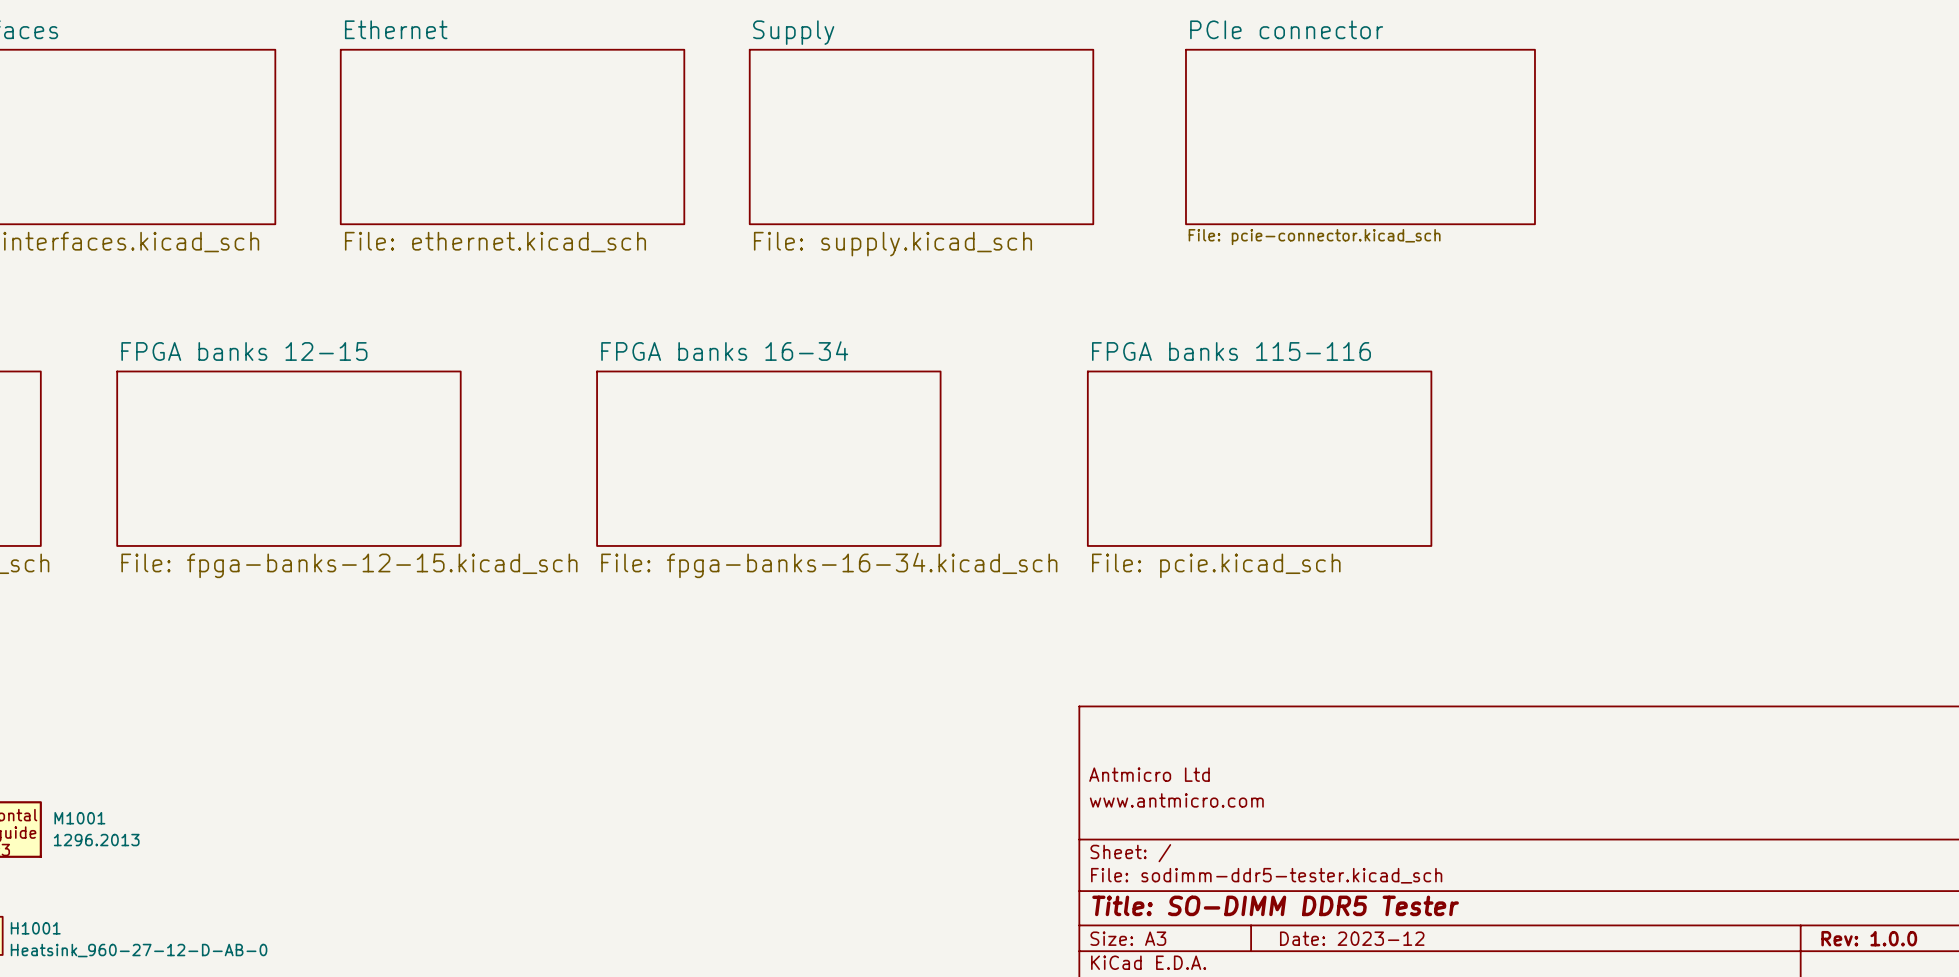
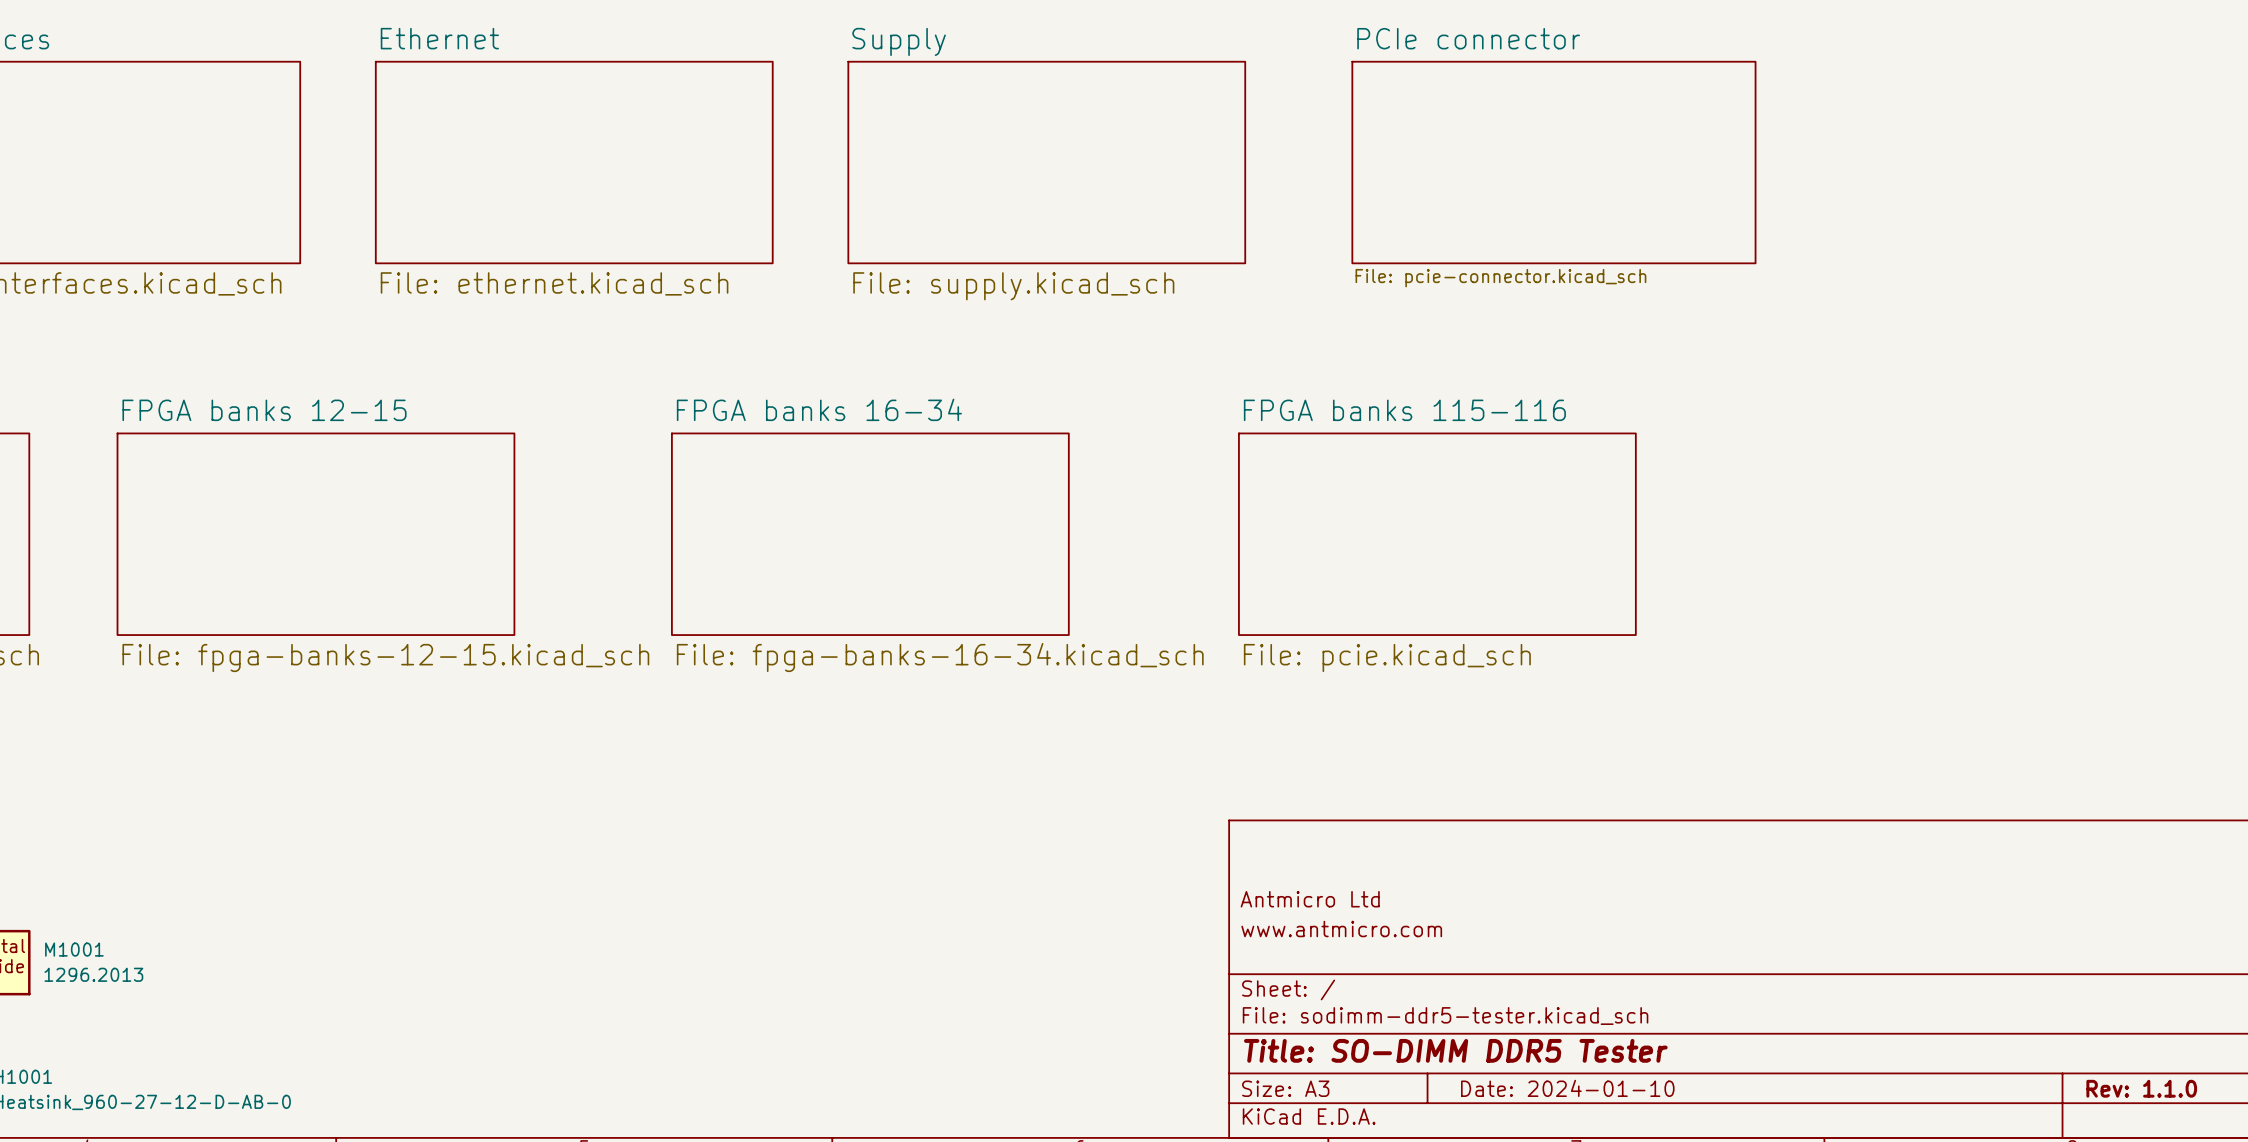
title block: Date: 2023-12 (1352, 938) -> Date: 2024-01-10 (1567, 1088)
title block: Rev: 1.0.0 (1869, 938) -> Rev: 1.1.0 (2141, 1088)

